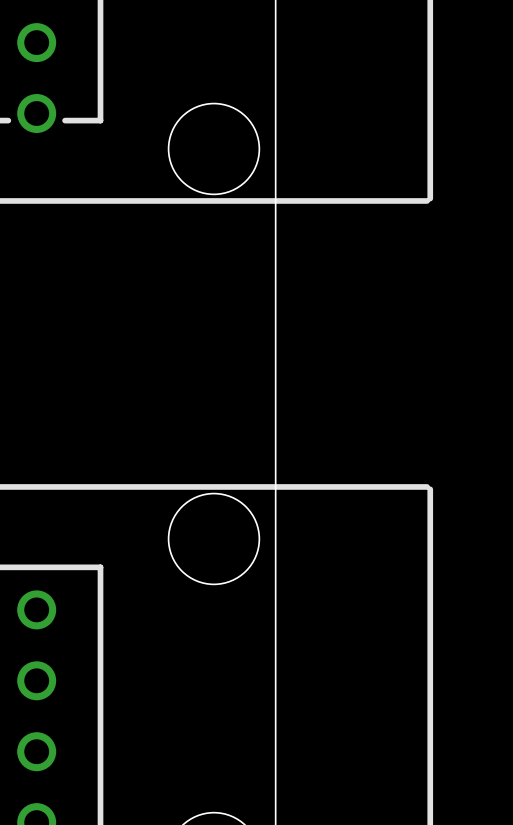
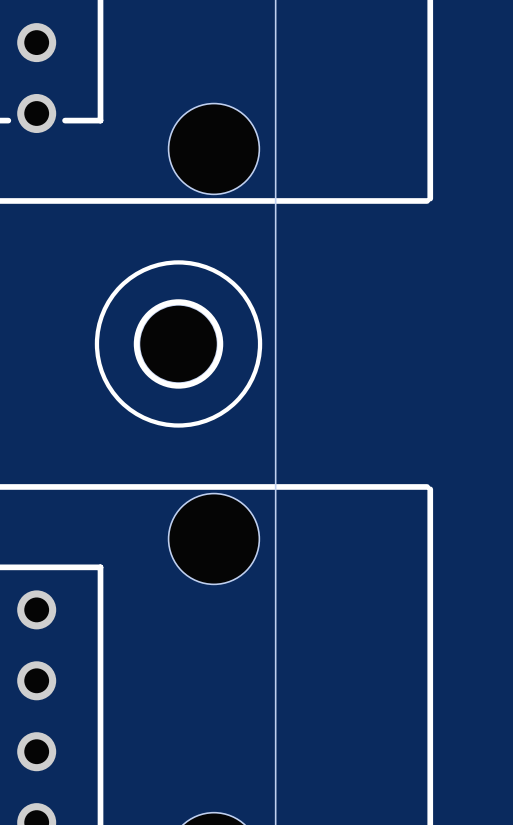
part: none -> (178, 343)

